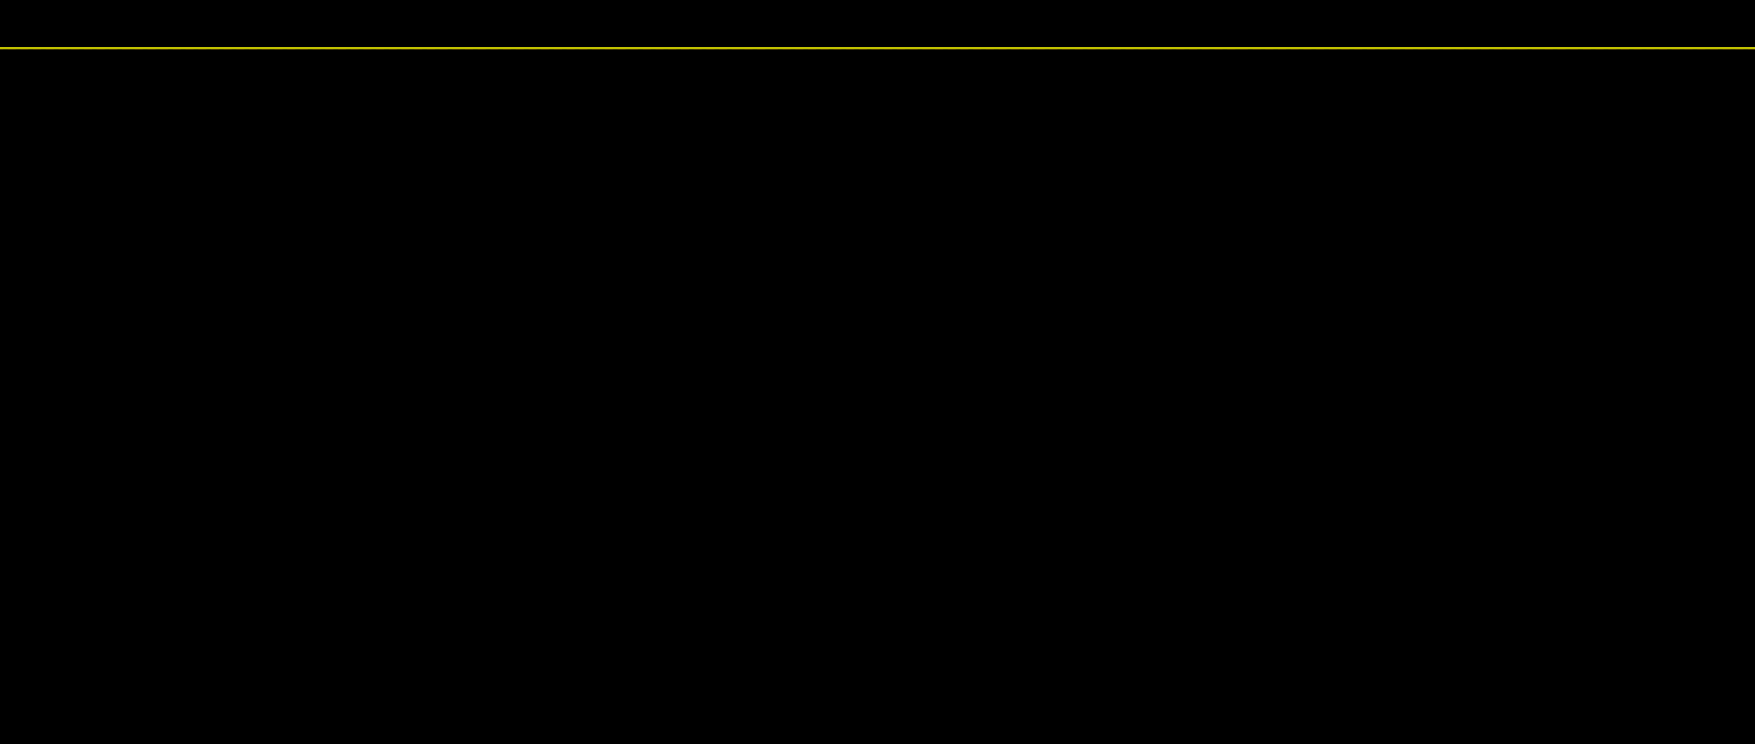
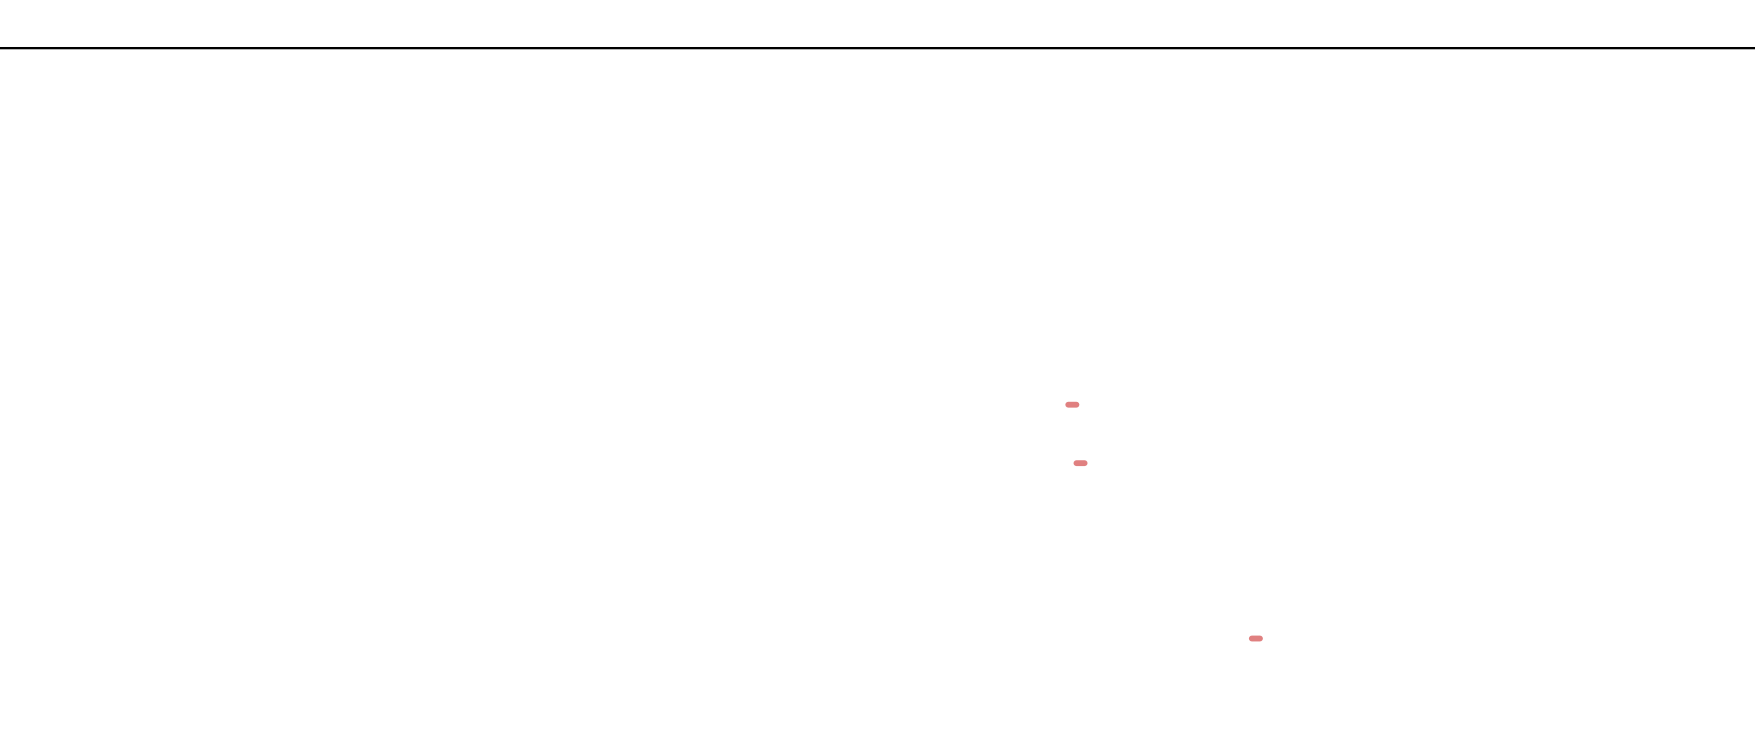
track: none -> (1068, 404) (1076, 404)
track: none -> (1076, 463) (1084, 463)
track: none -> (1251, 638) (1259, 638)

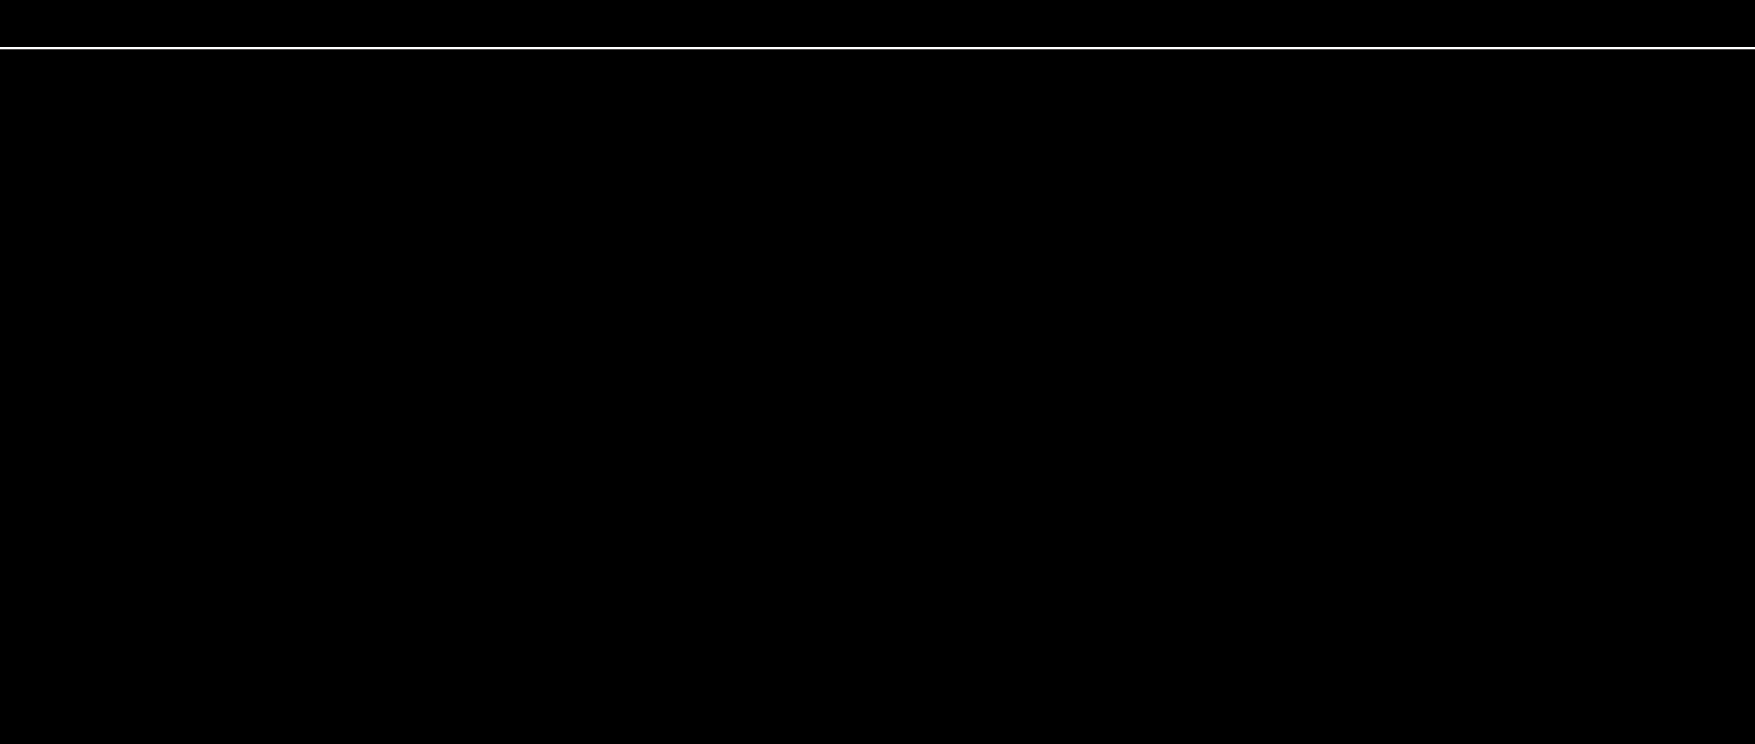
track: (1068, 404) (1076, 404) -> none
track: (1076, 463) (1084, 463) -> none
track: (1251, 638) (1259, 638) -> none

